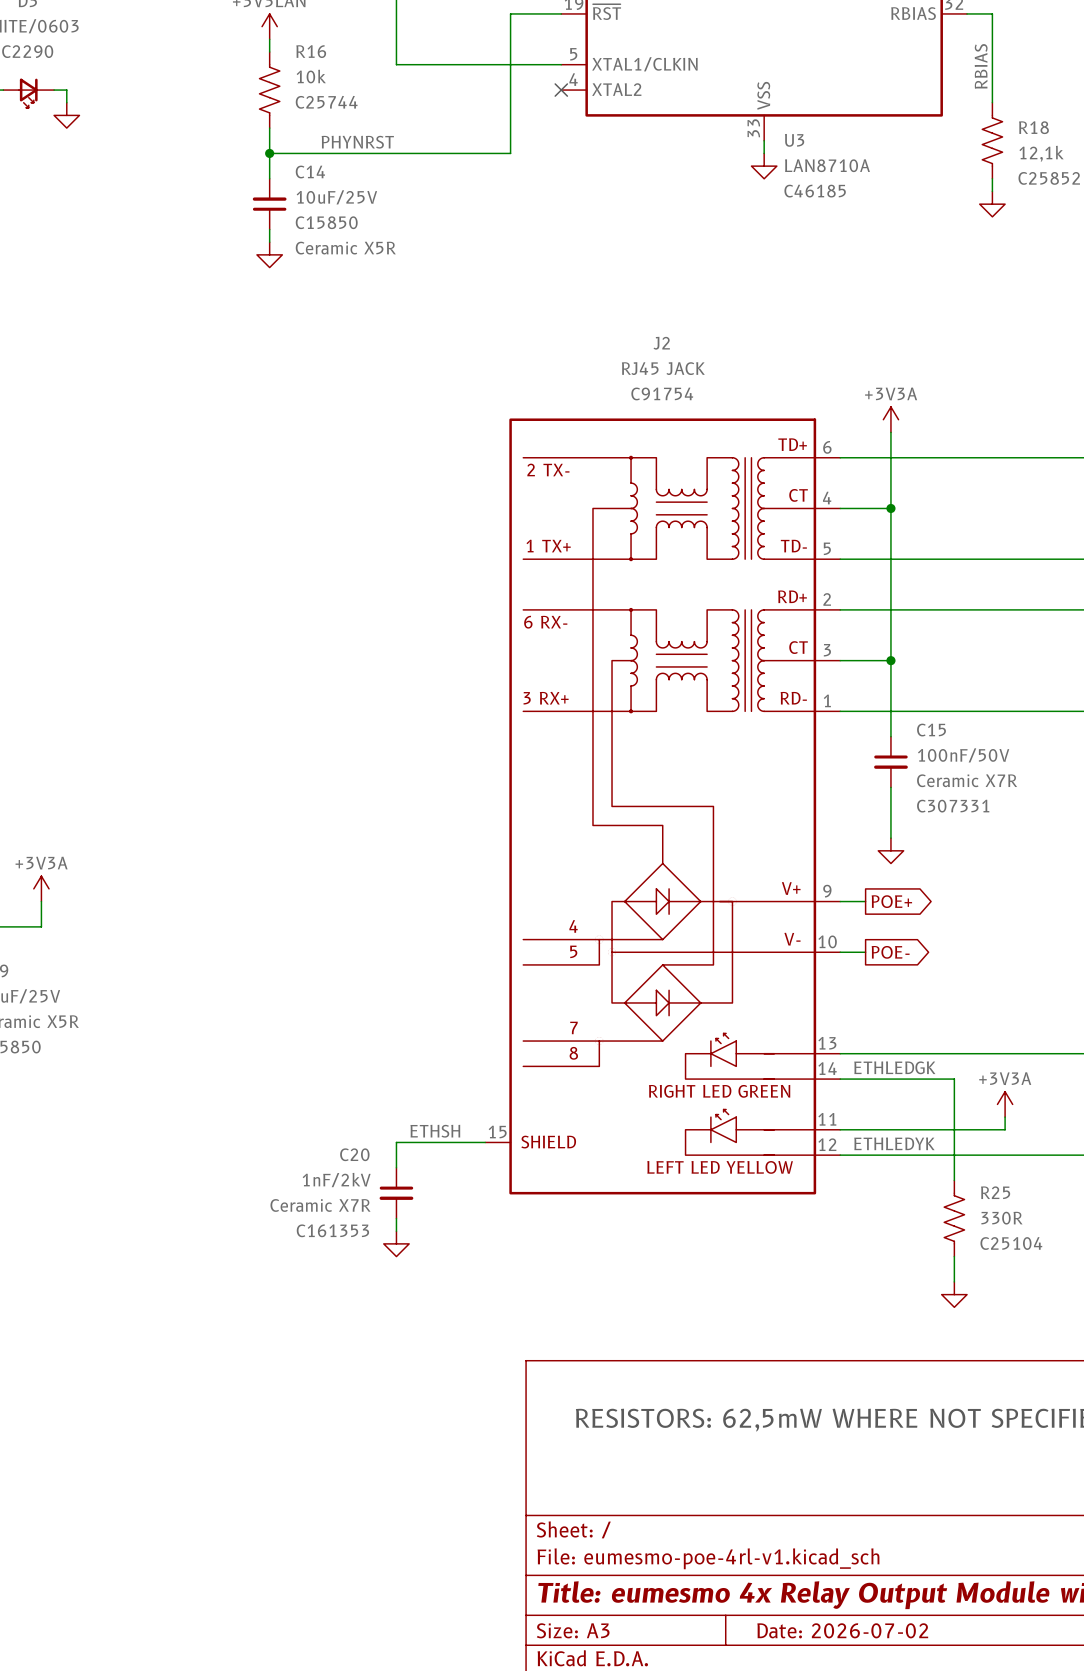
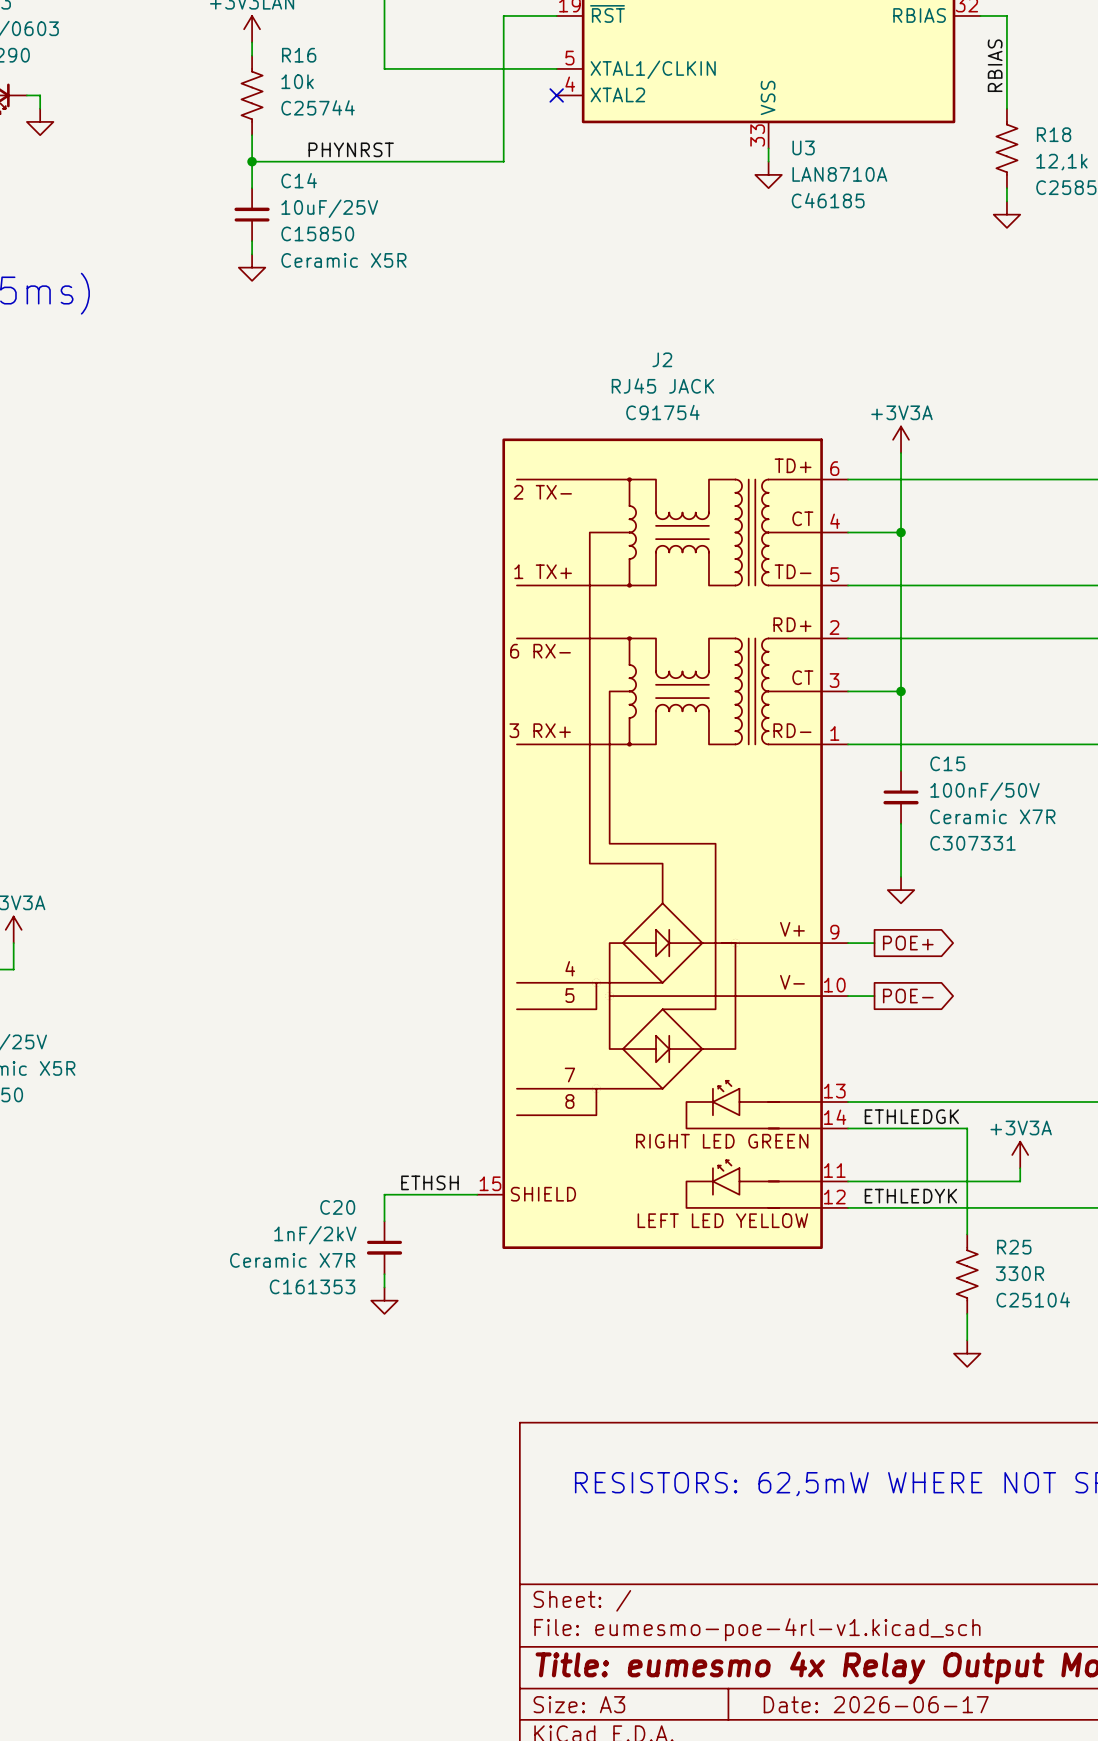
title block: Date: 2026-07-02 (842, 1630) -> Date: 2026-06-17 (876, 1704)

